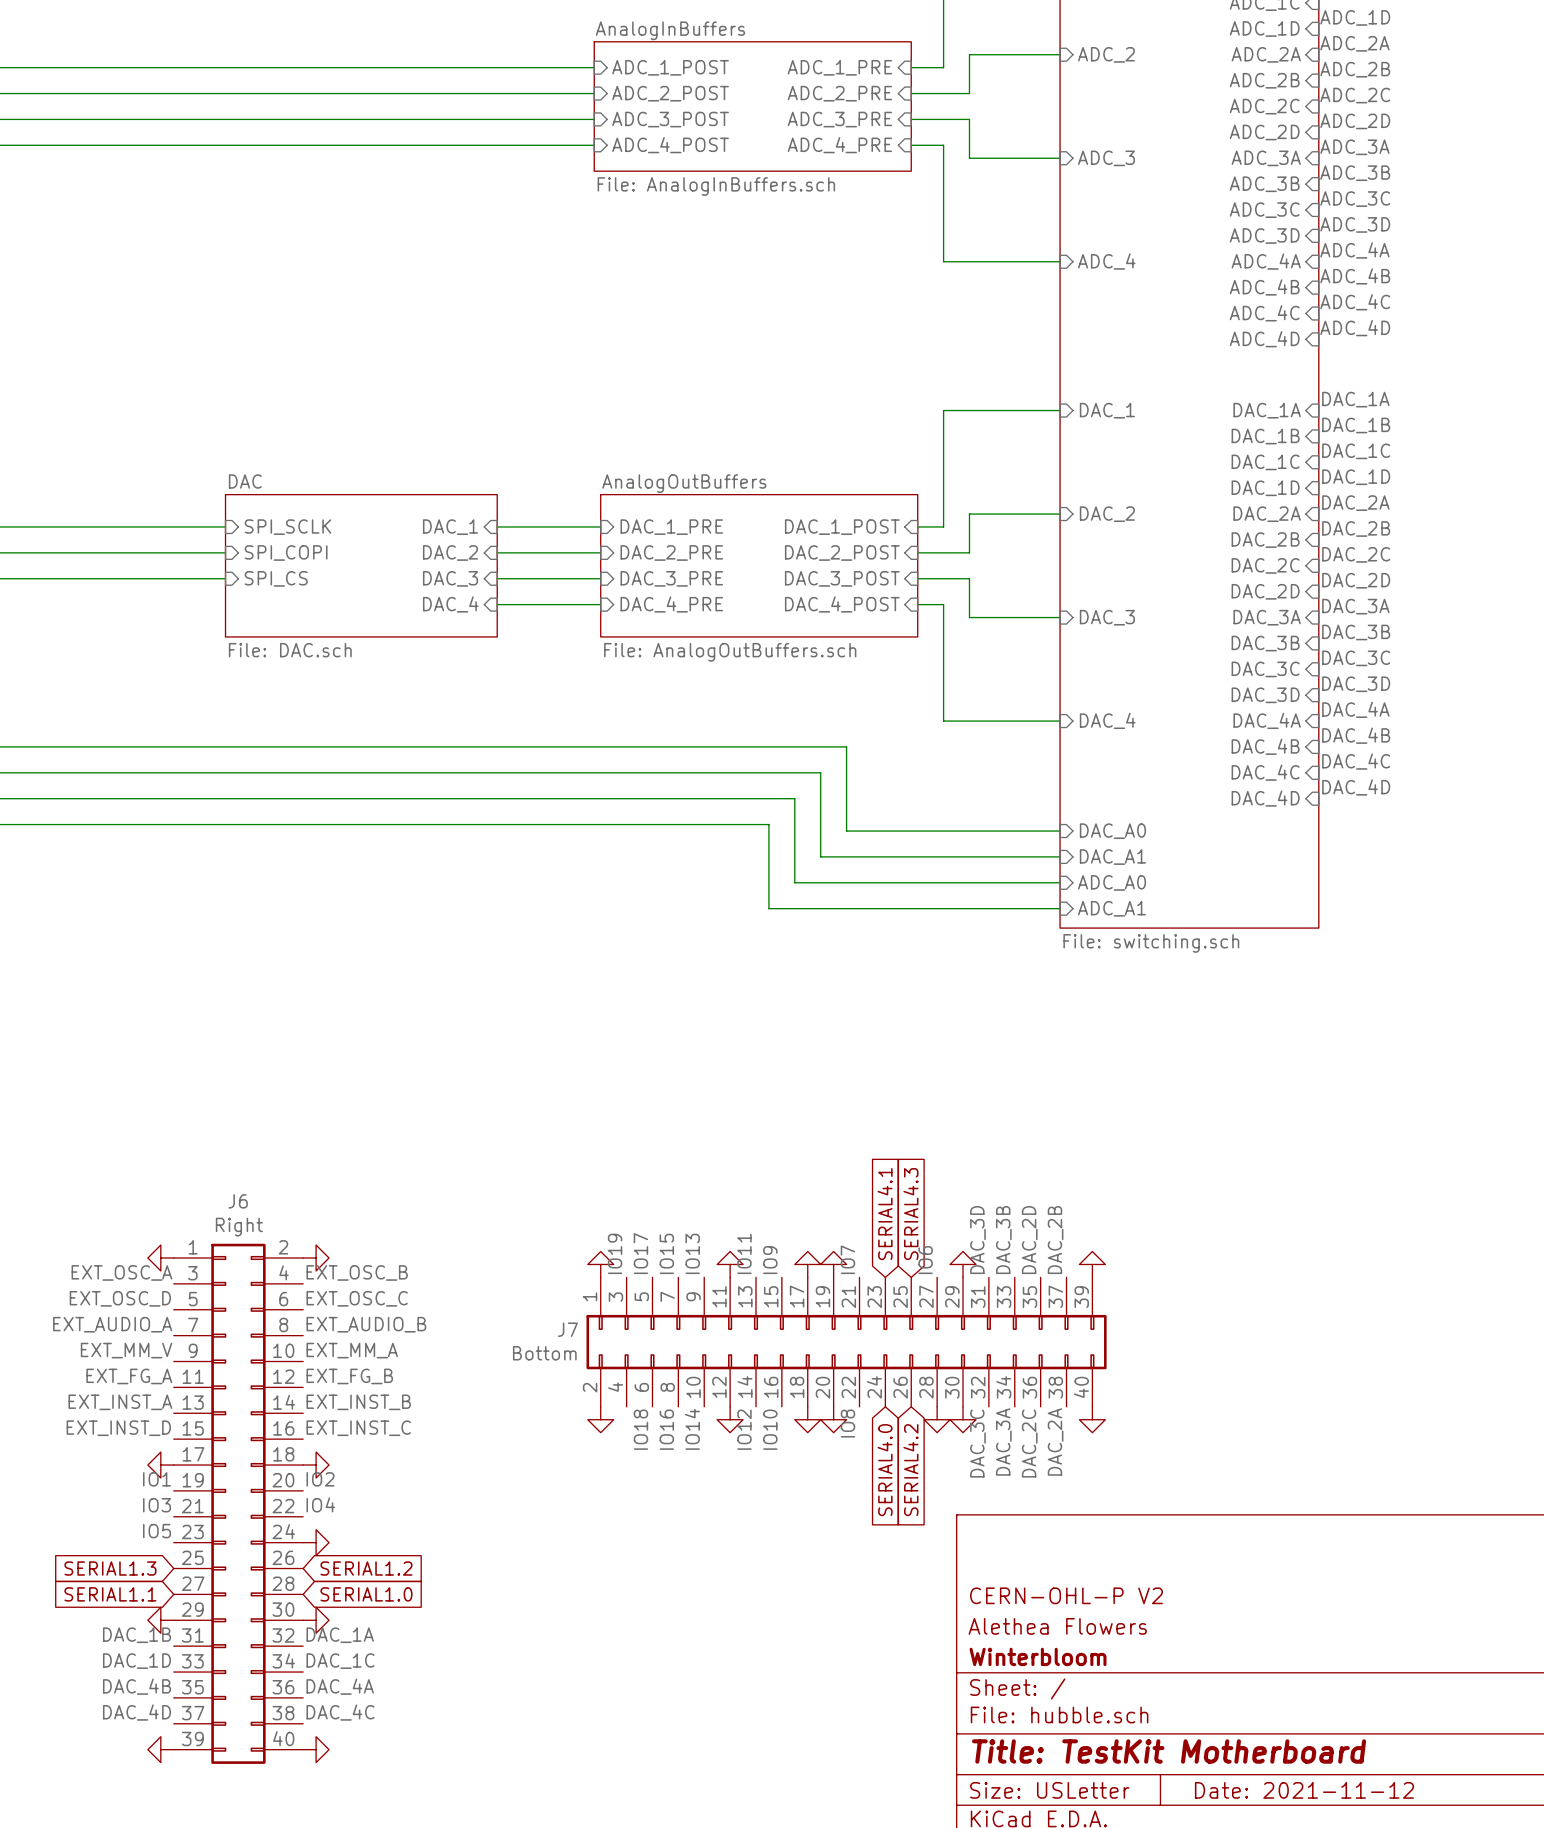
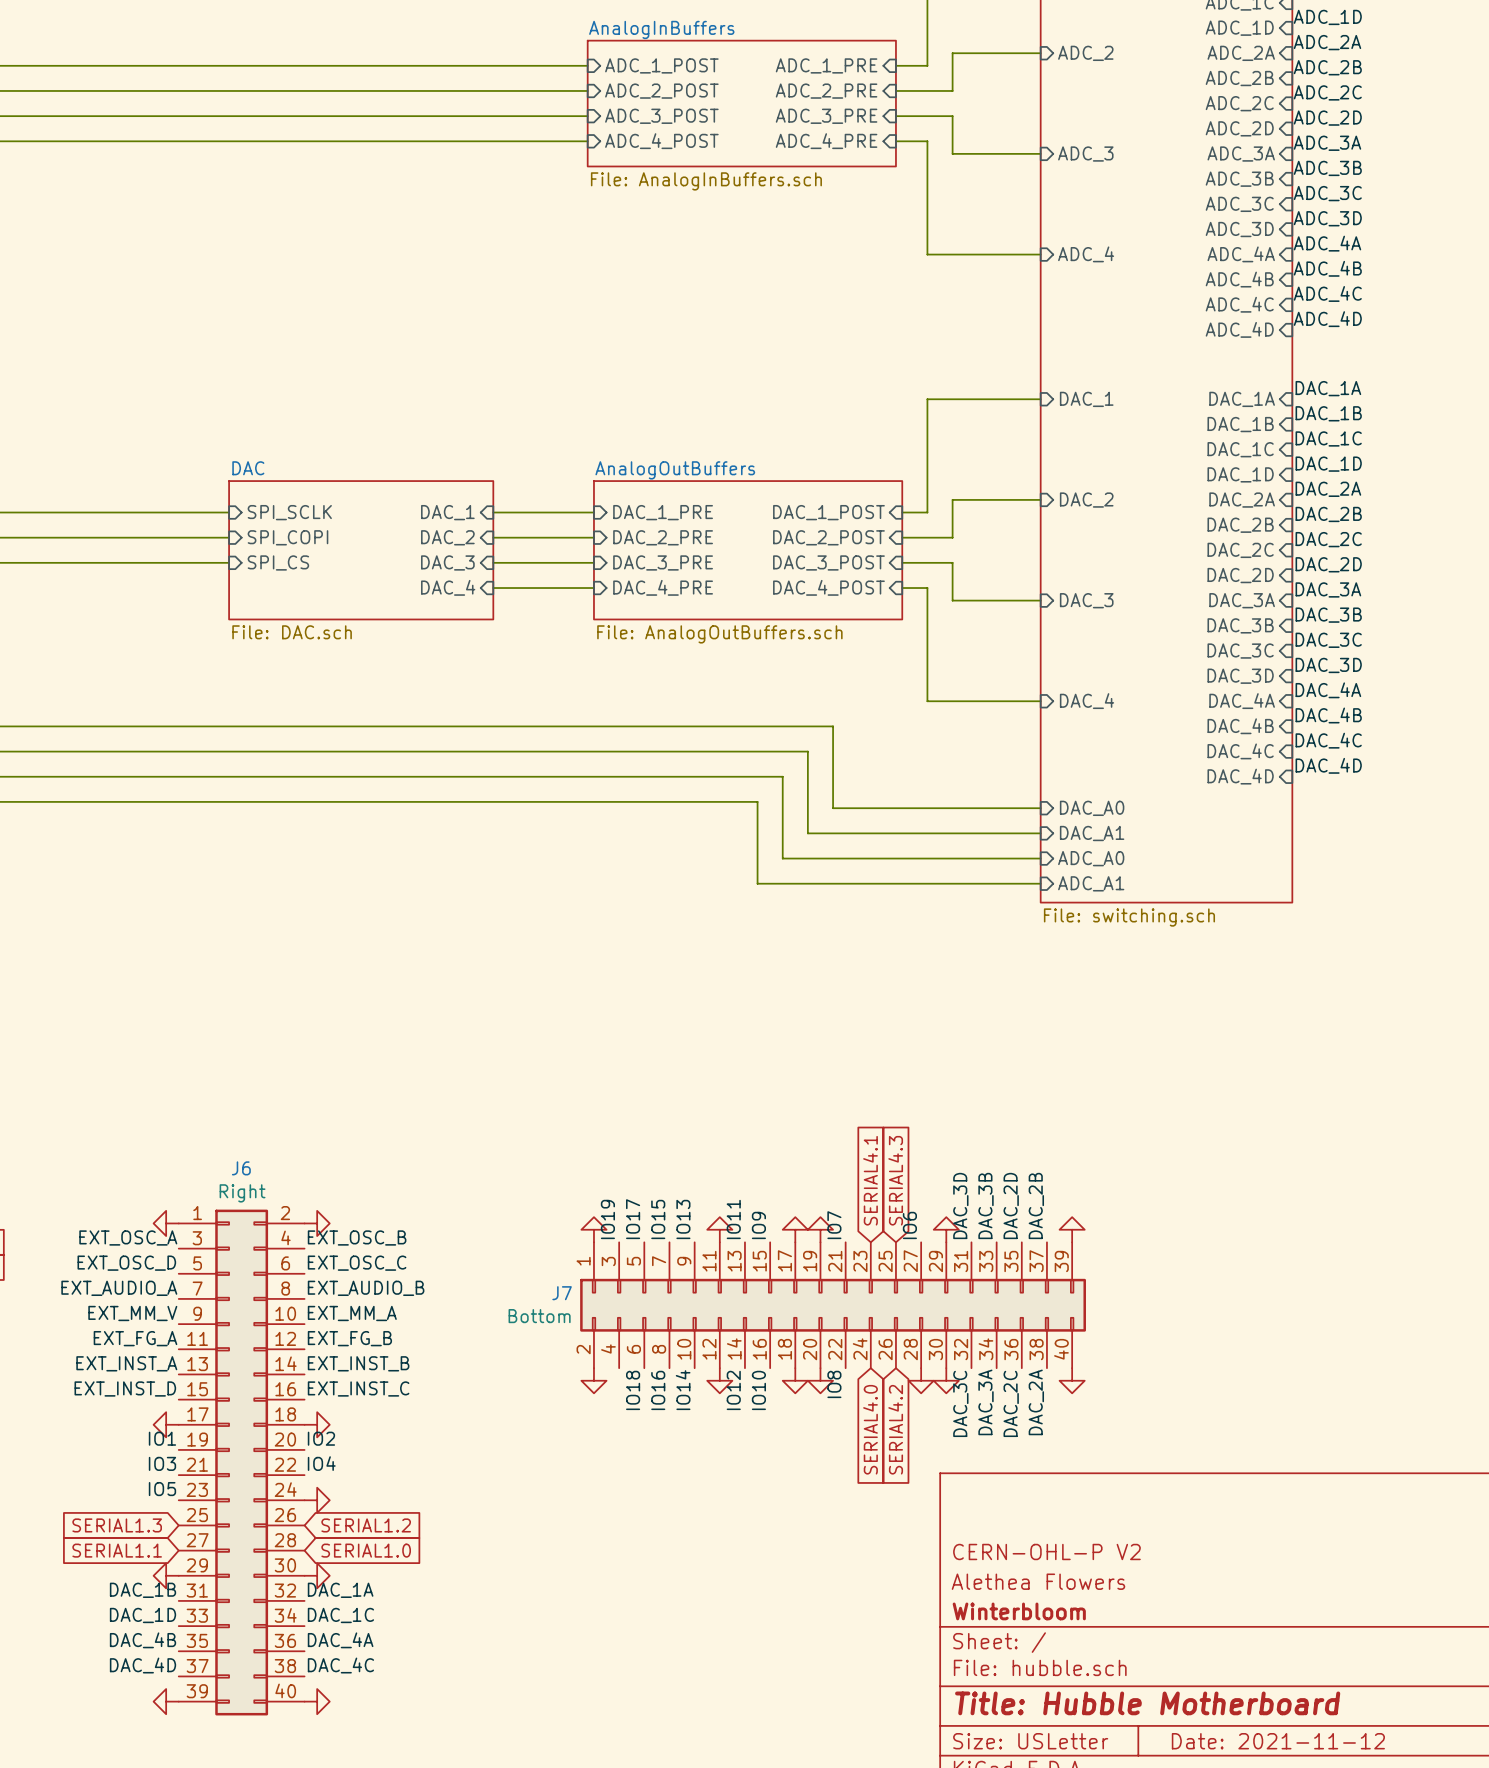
title block: Title: TestKit Motherboard (1169, 1751) -> Title: Hubble Motherboard (1147, 1703)

